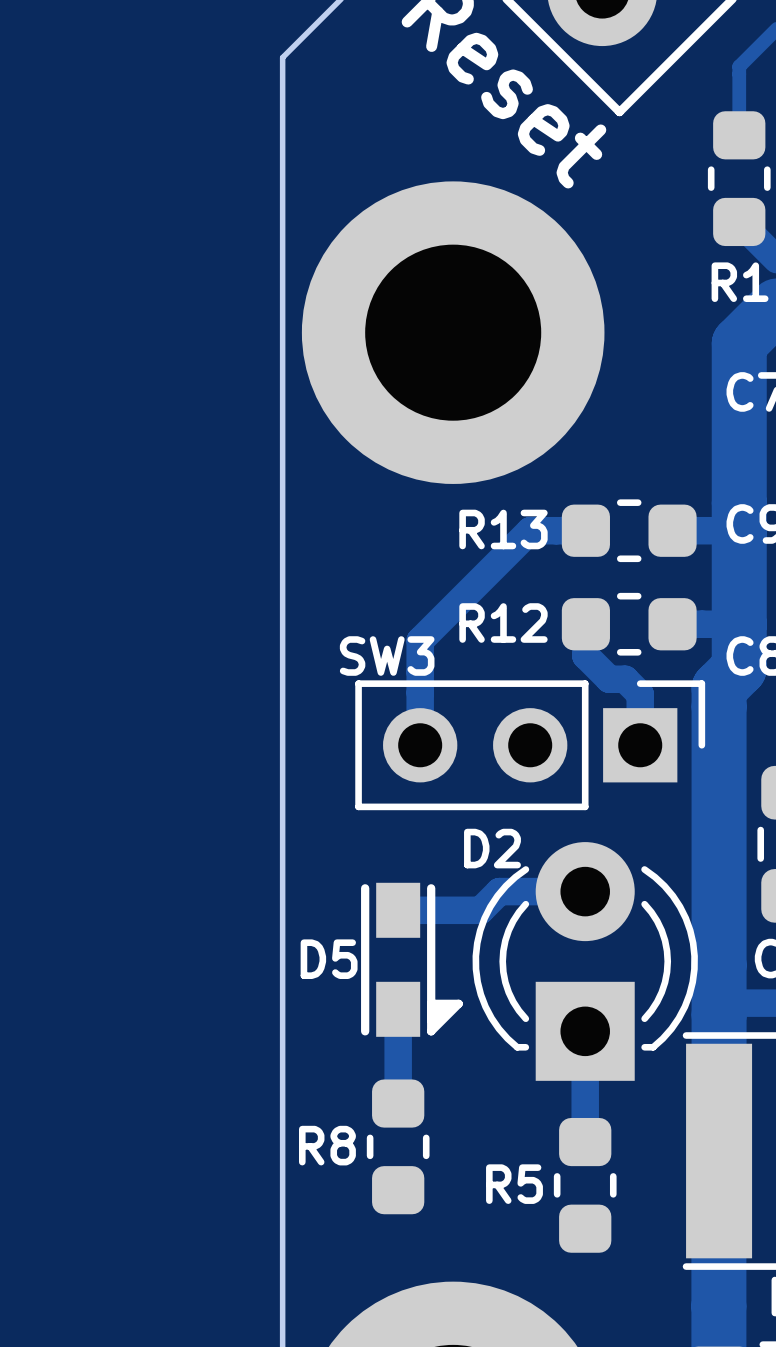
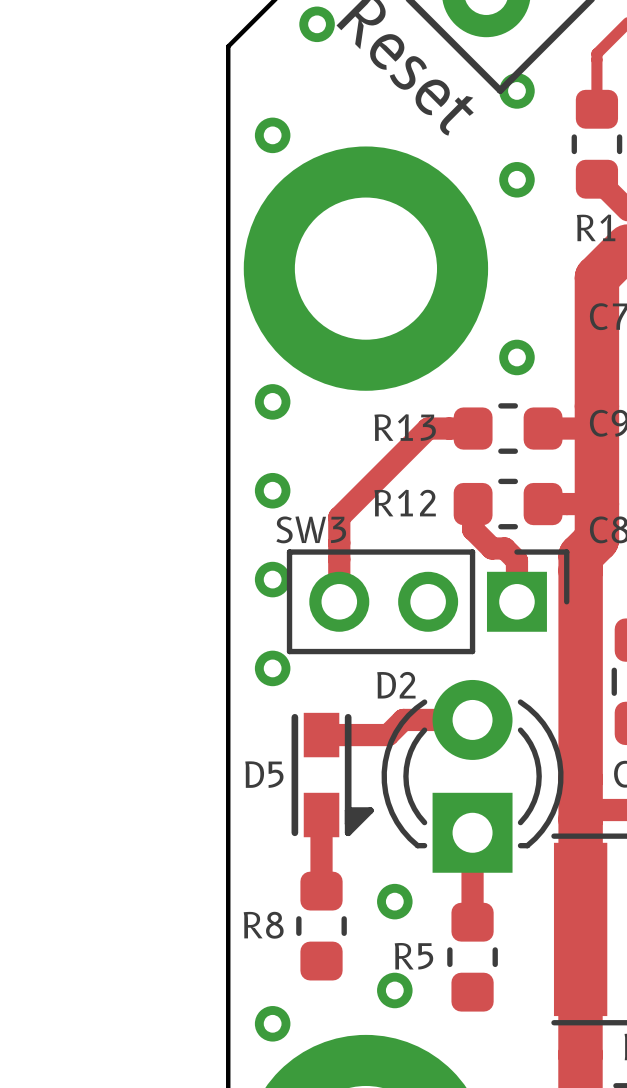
via: none -> (317, 24)
via: none -> (516, 90)
via: none -> (272, 135)
via: none -> (516, 179)
via: none -> (516, 357)
via: none -> (272, 401)
via: none -> (272, 490)
via: none -> (272, 579)
via: none -> (272, 668)
via: none -> (394, 901)
via: none -> (394, 990)
via: none -> (272, 1023)

